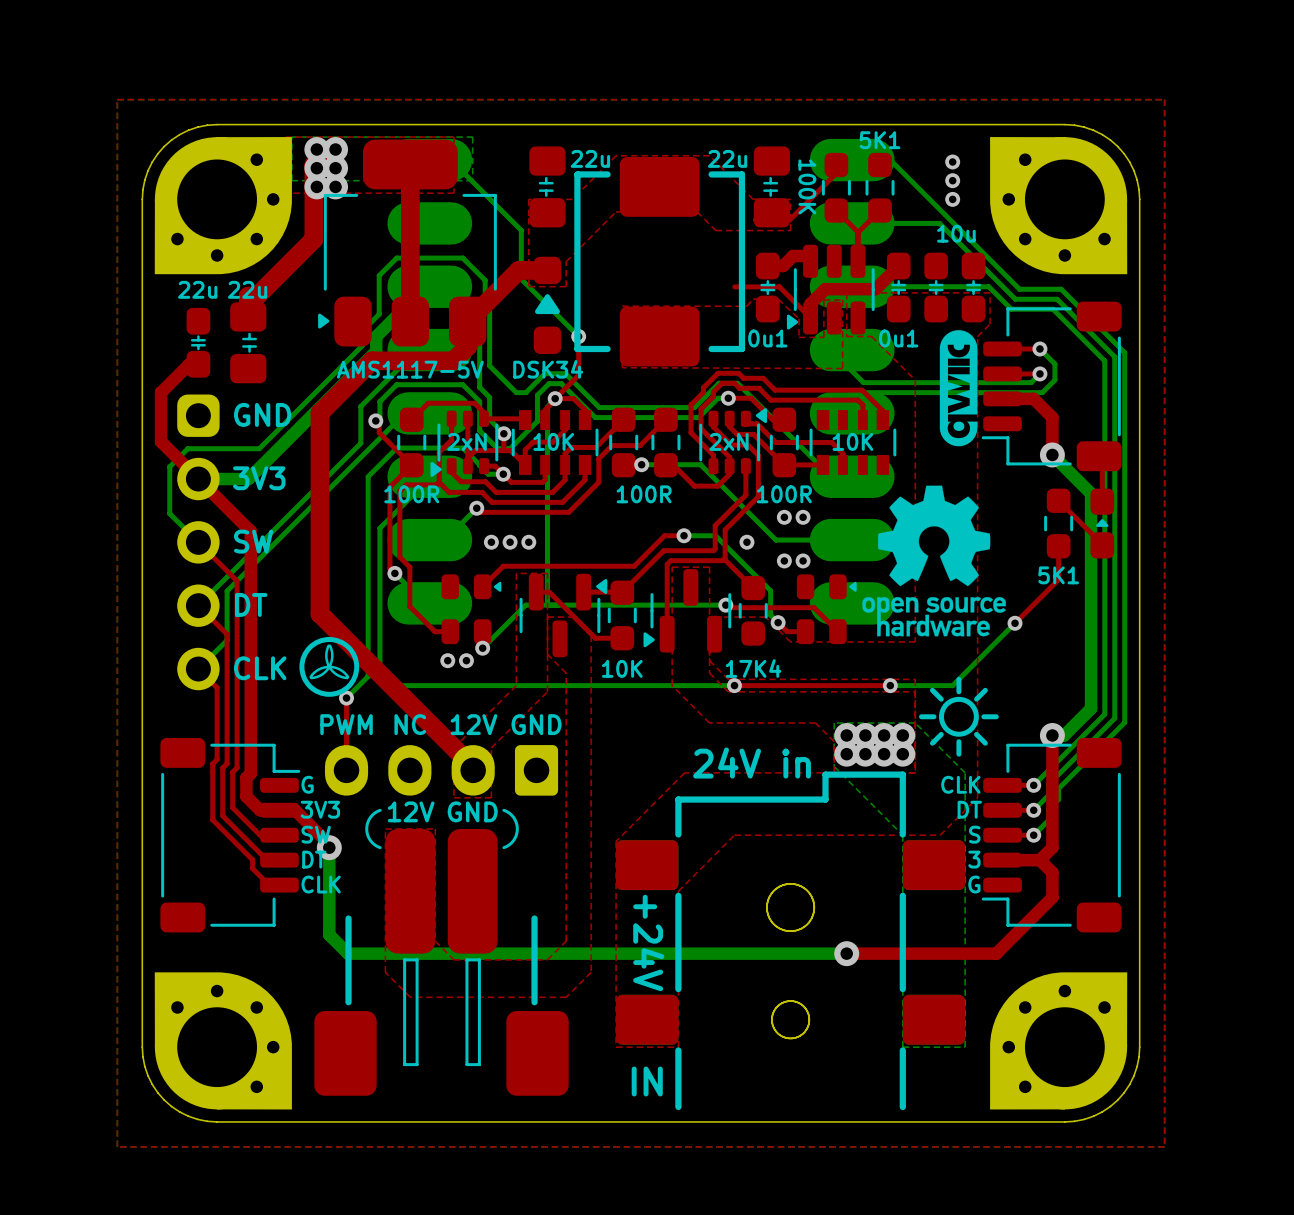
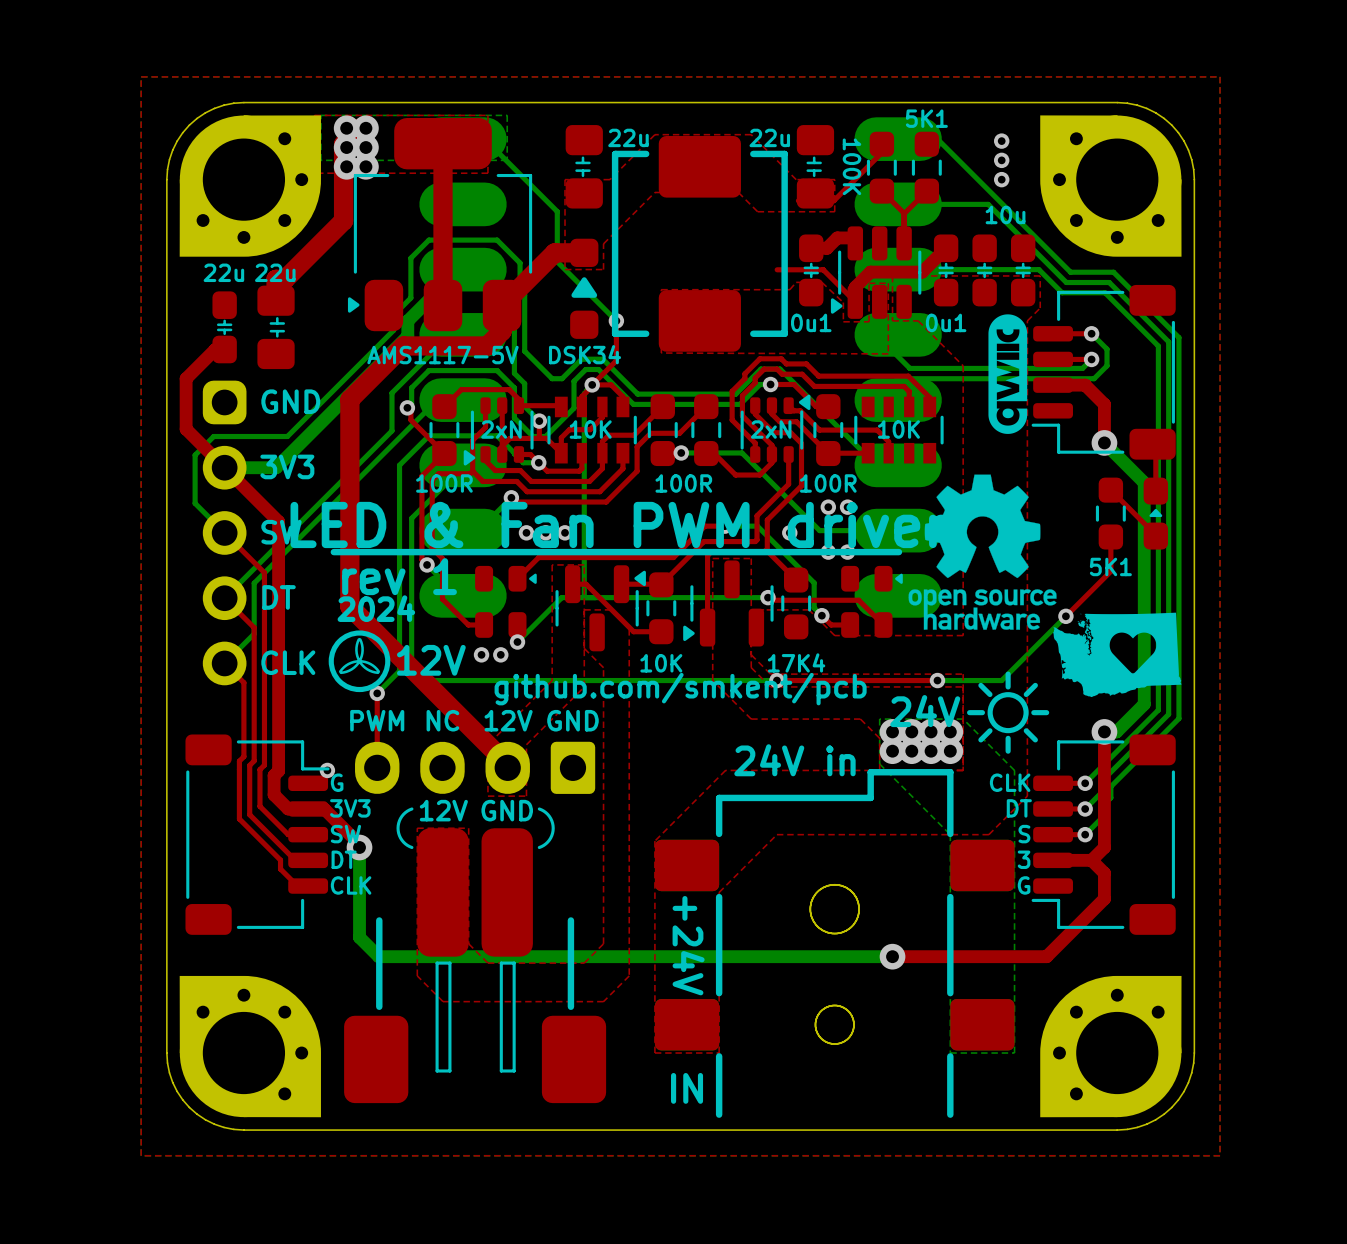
text: none -> LED & Fan PWM driver (619, 524)
line: none -> (333, 552) (898, 552)
text: none -> rev 1 (399, 576)
text: none -> 2024 (376, 608)
drawing: none -> [1053, 612, 1182, 698]
text: none -> 12V (431, 660)
text: none -> github.com/smkent/pcb (680, 689)
text: none -> 24V (925, 711)
via: none -> (327, 770)

